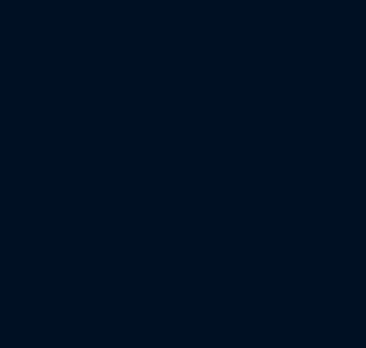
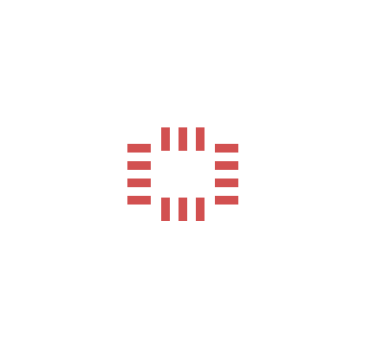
part: none -> (182, 174)

